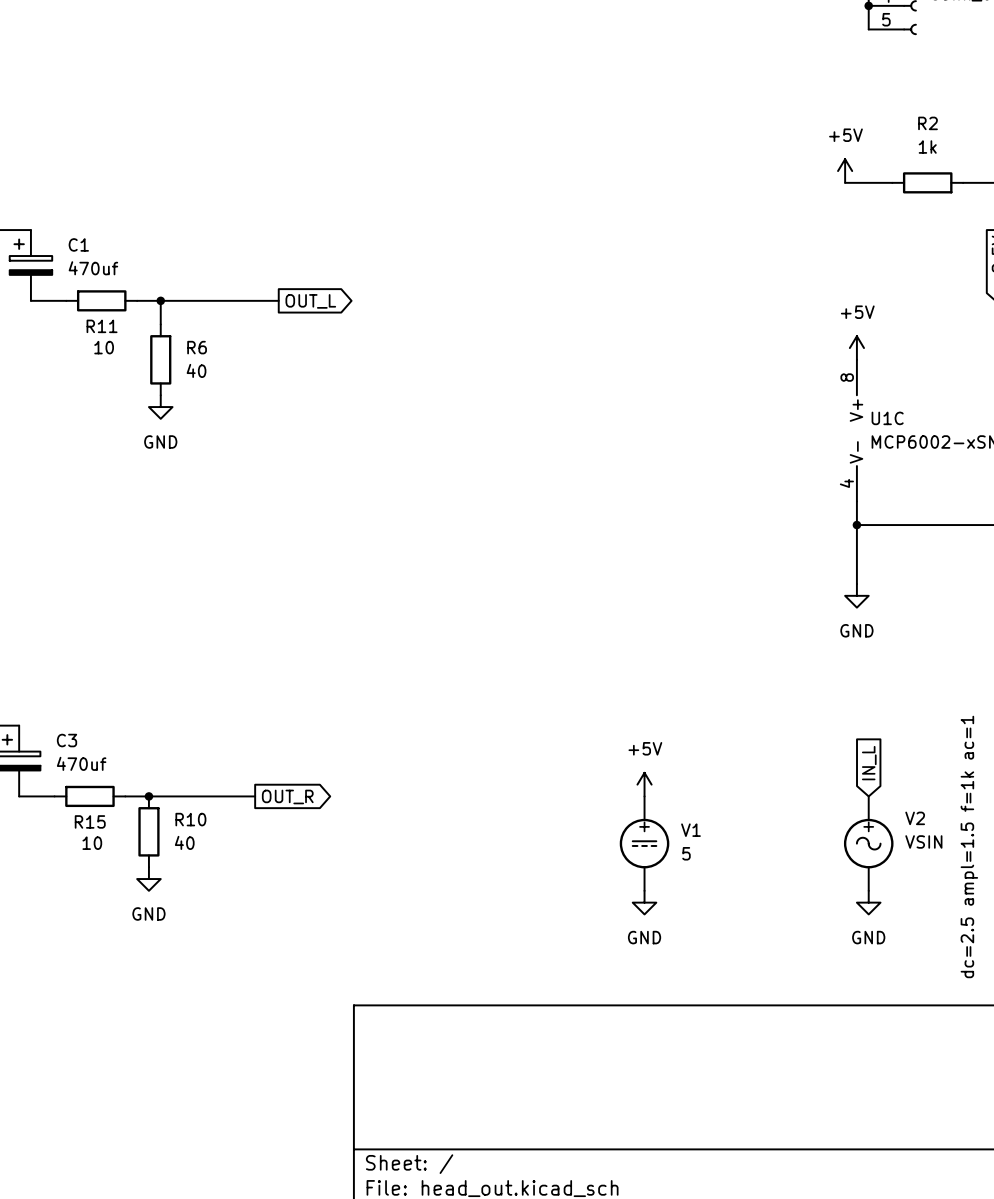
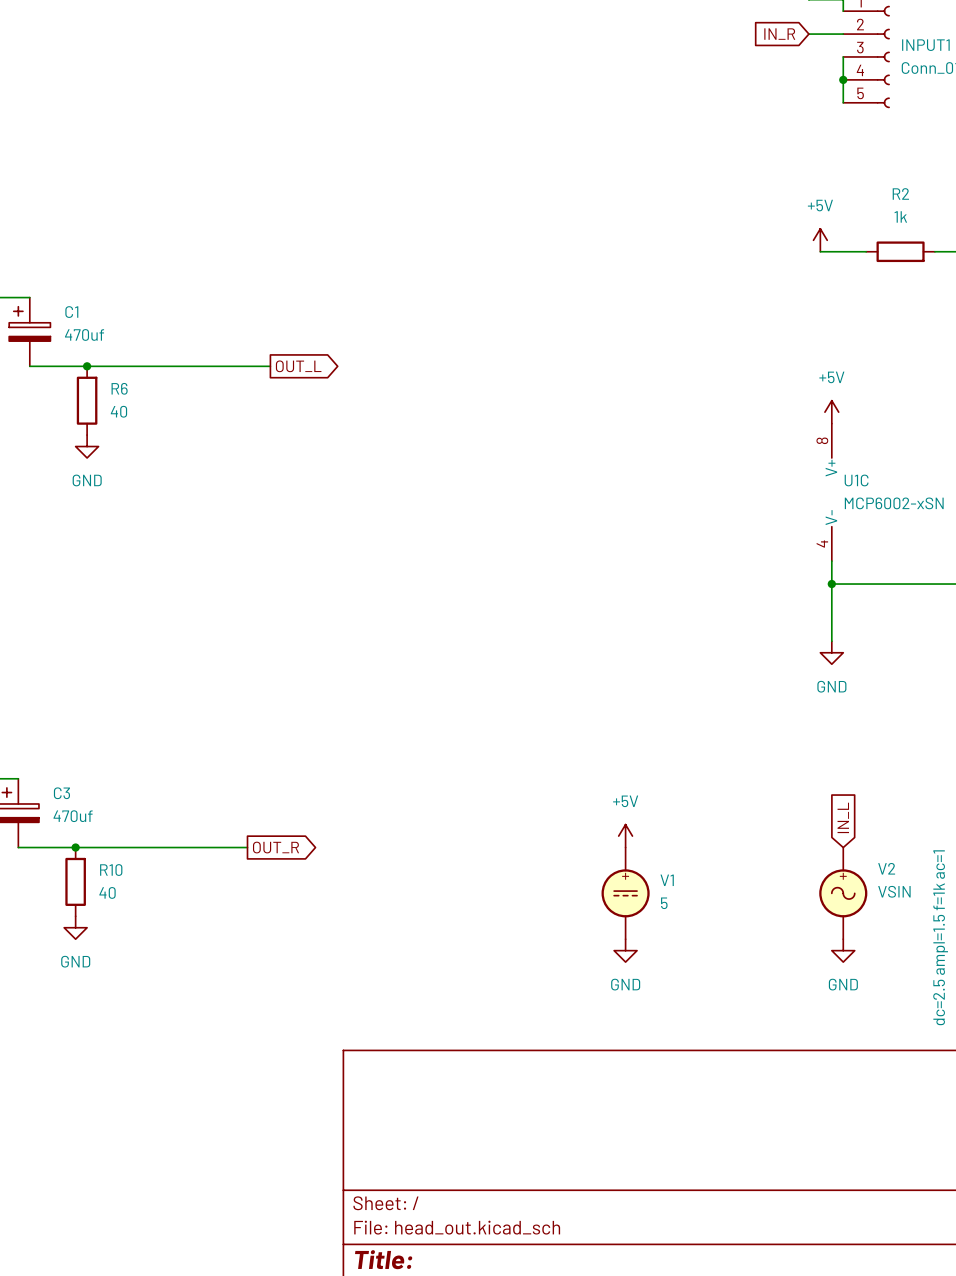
wire: none -> (64, 366) (132, 366)
junction: none -> (87, 366)
R11: 10 (101, 300) -> none
wire: (160, 300) (160, 324) -> none
junction: (160, 300) -> none
R6 position: (160, 359) -> (87, 400)
power symbol position: GND (160, 407) -> GND (87, 446)
wire: none -> (52, 847) (121, 847)
junction: none -> (75, 847)
R15: 10 (89, 796) -> none
junction: (148, 796) -> none
R10 position: (148, 831) -> (75, 881)
power symbol position: GND (148, 879) -> GND (75, 927)

